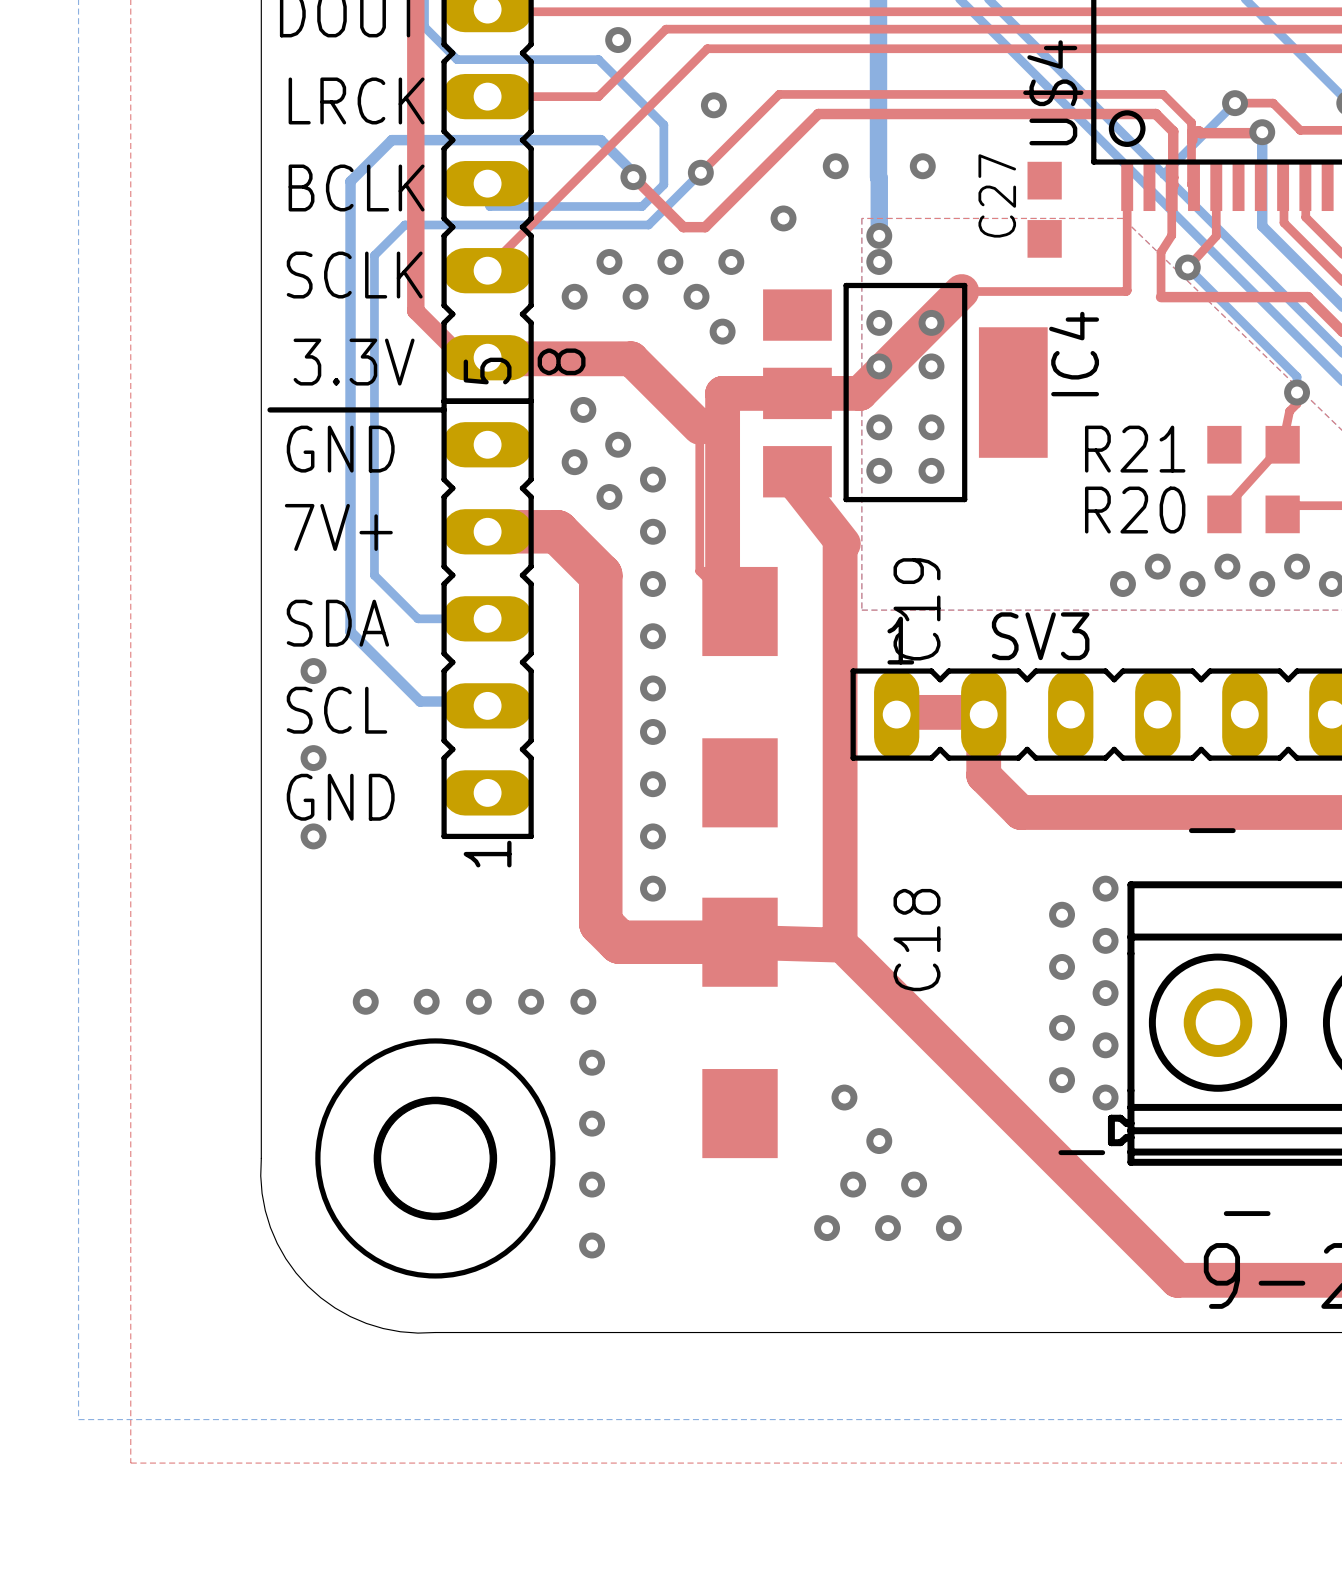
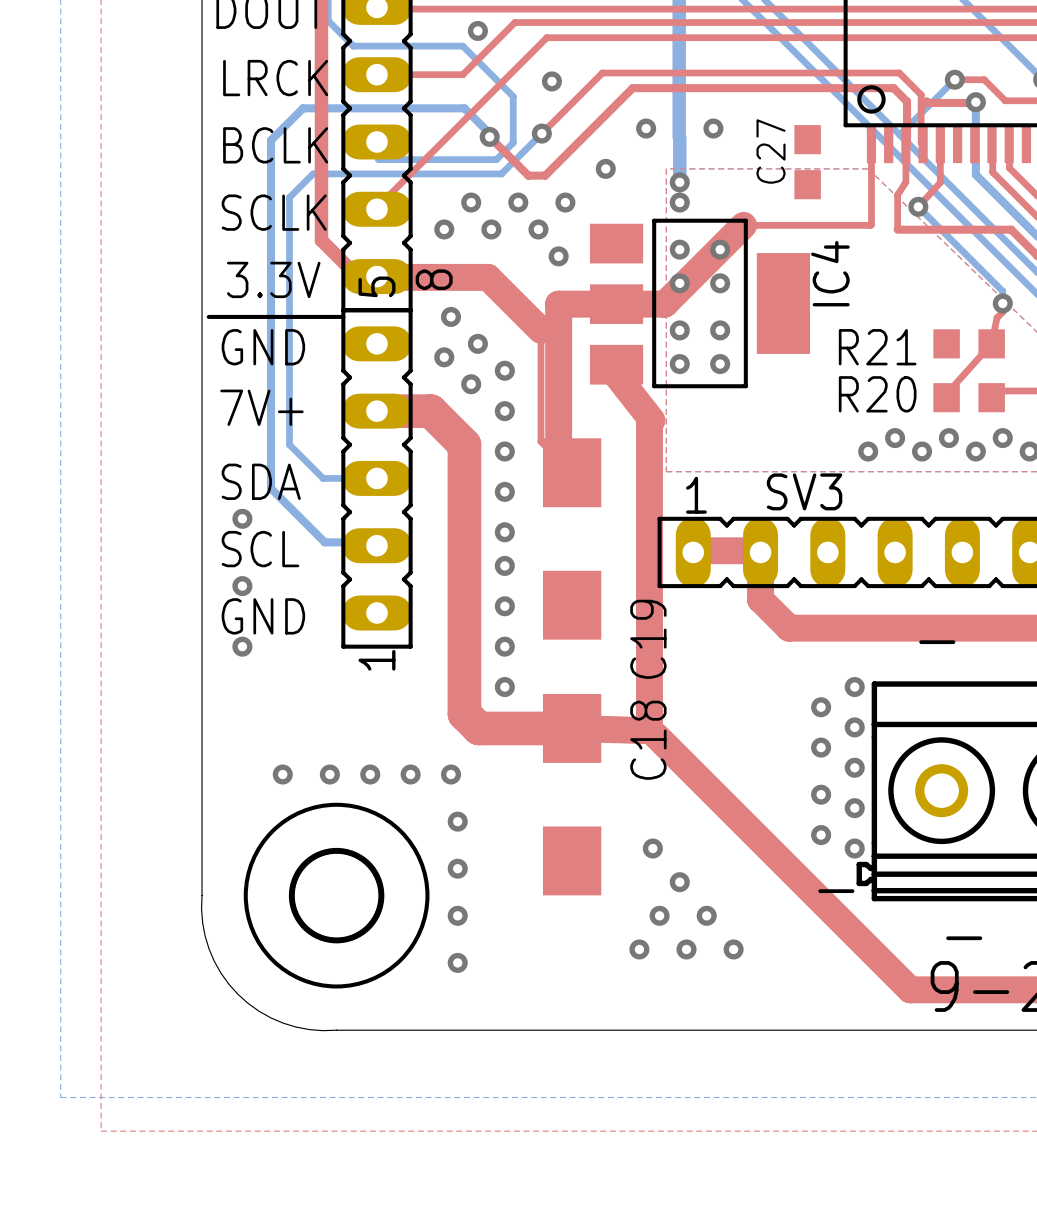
U$4 name: U$4 (1053, 92) -> none
C19 name position: C19 (917, 609) -> C19 (648, 639)
C18 name position: C18 (917, 940) -> C18 (648, 740)

